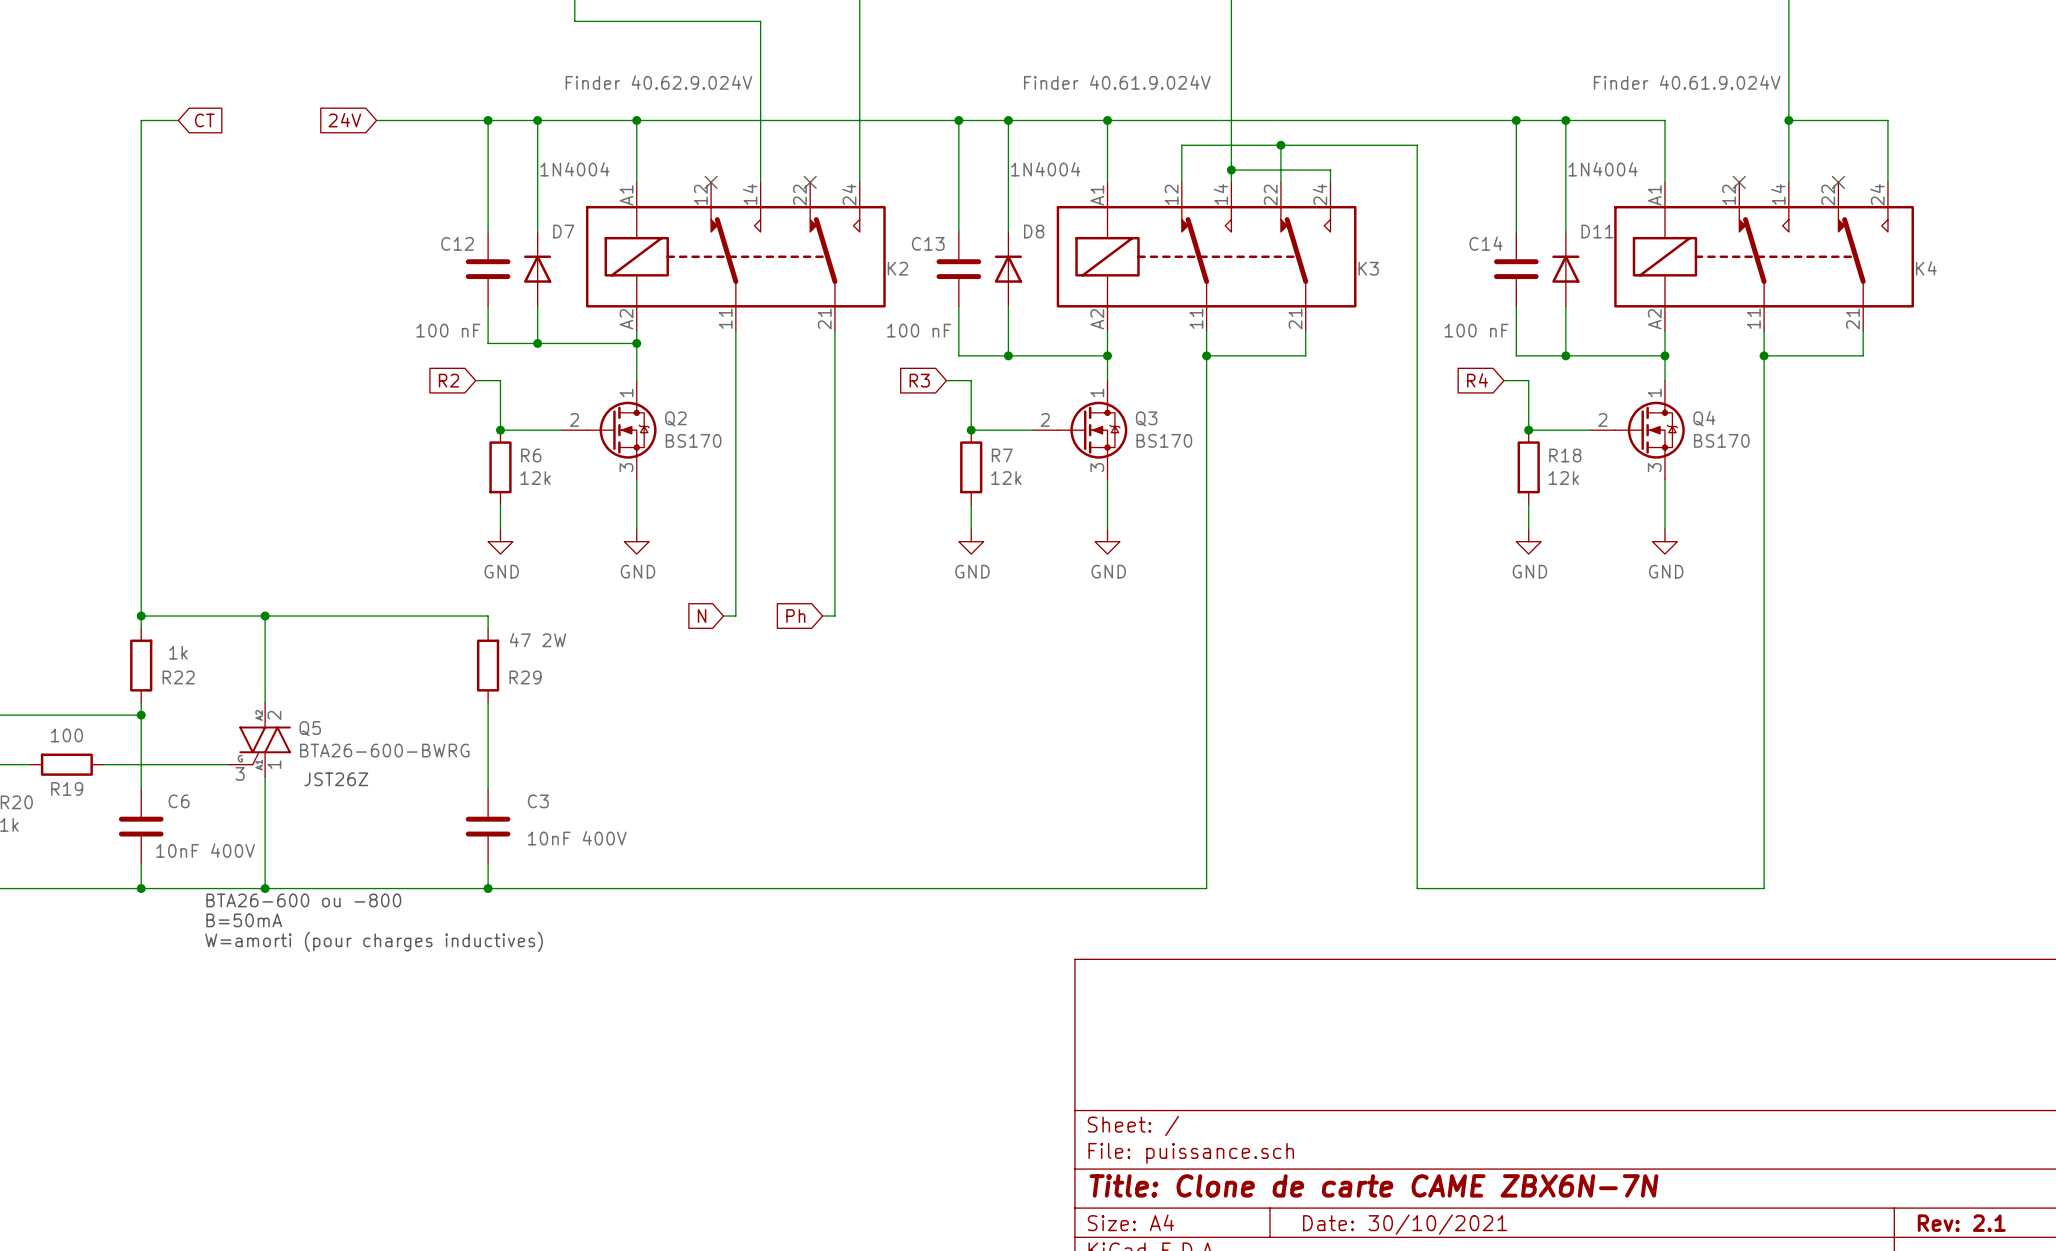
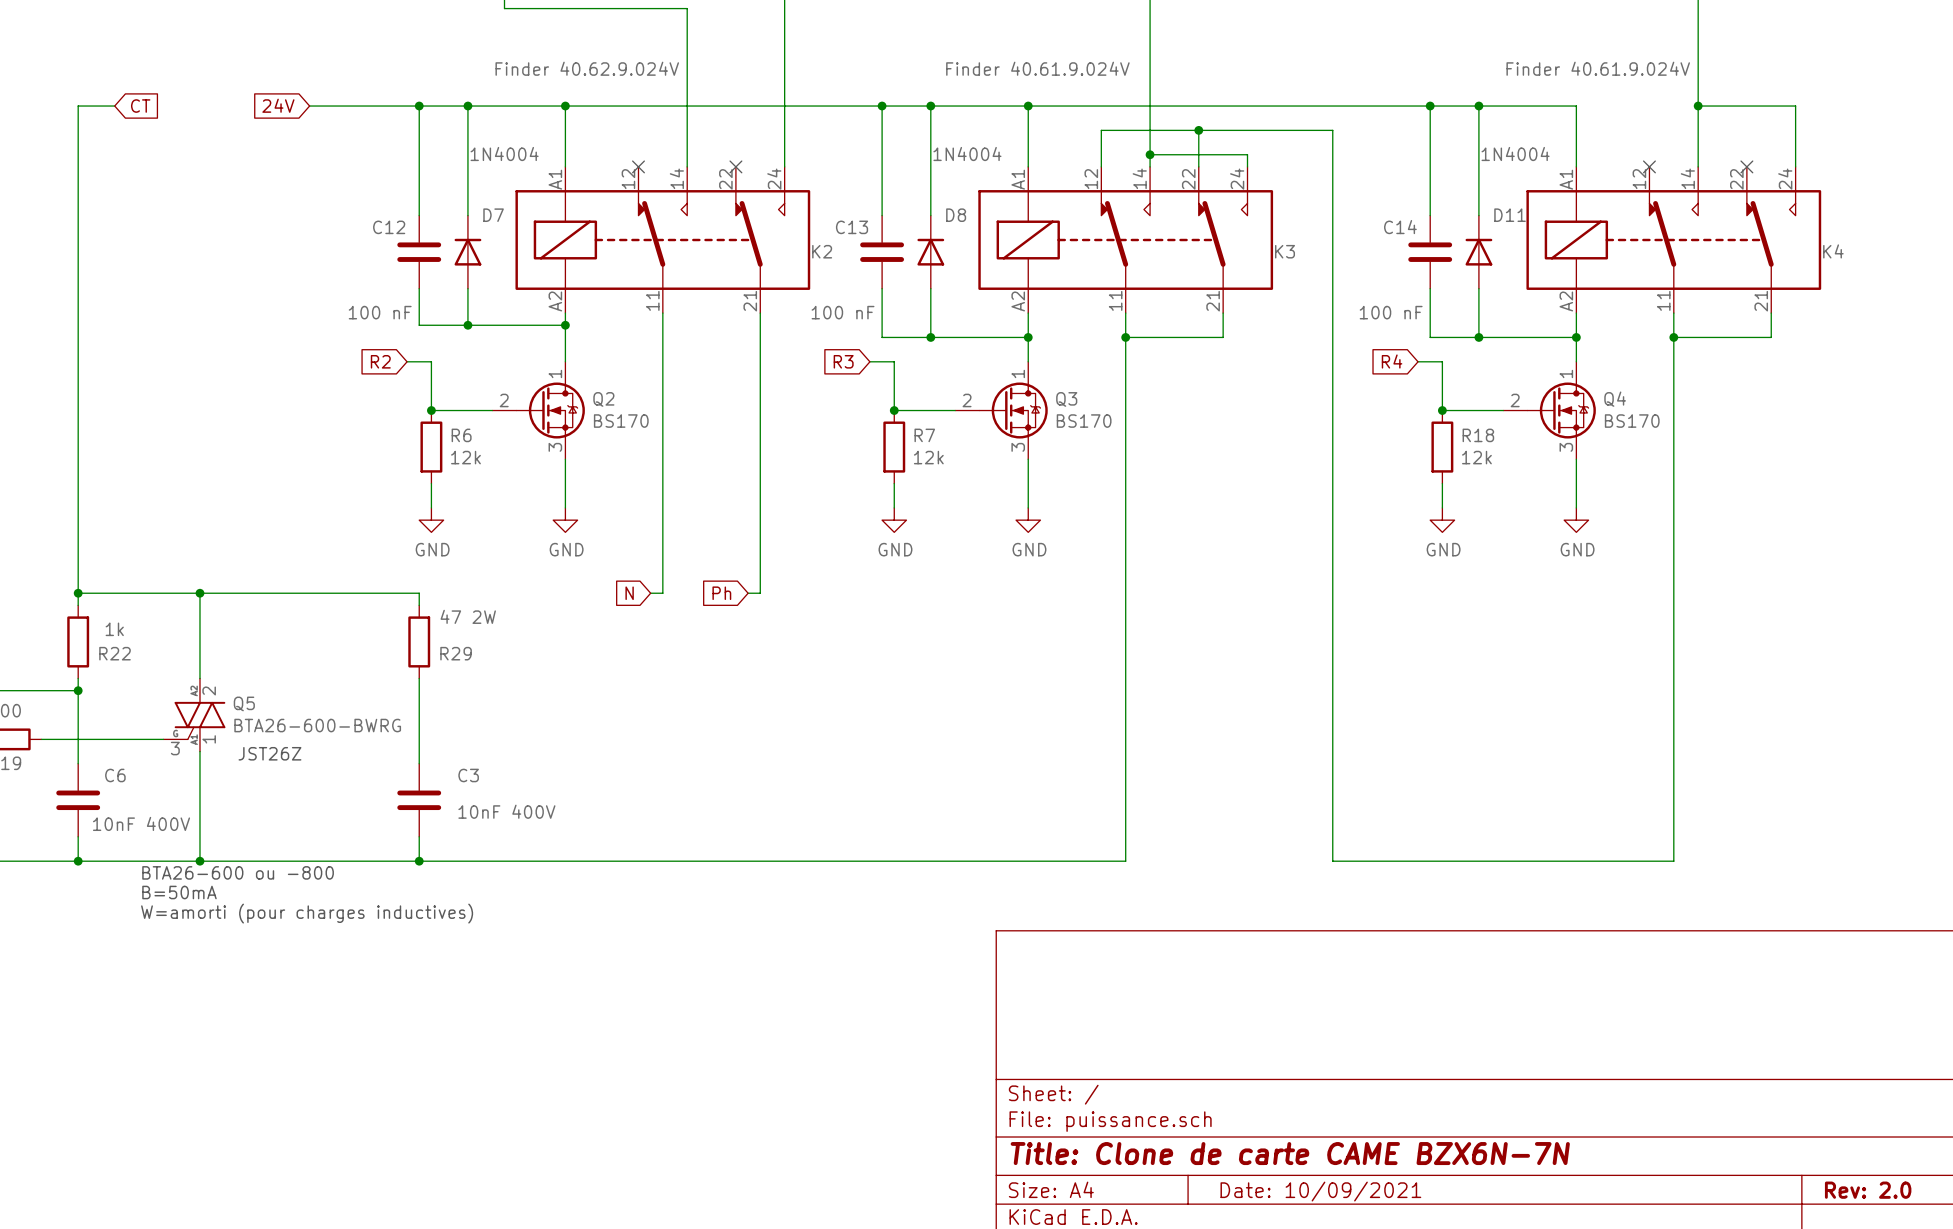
title block: Title: Clone de carte CAME ZBX6N-7N (1373, 1185) -> Title: Clone de carte CAME BZX6N-7N (1290, 1153)
title block: Rev: 2.1 (1961, 1223) -> Rev: 2.0 (1868, 1190)
title block: Date: 30/10/2021 (1405, 1224) -> Date: 10/09/2021 (1320, 1191)

